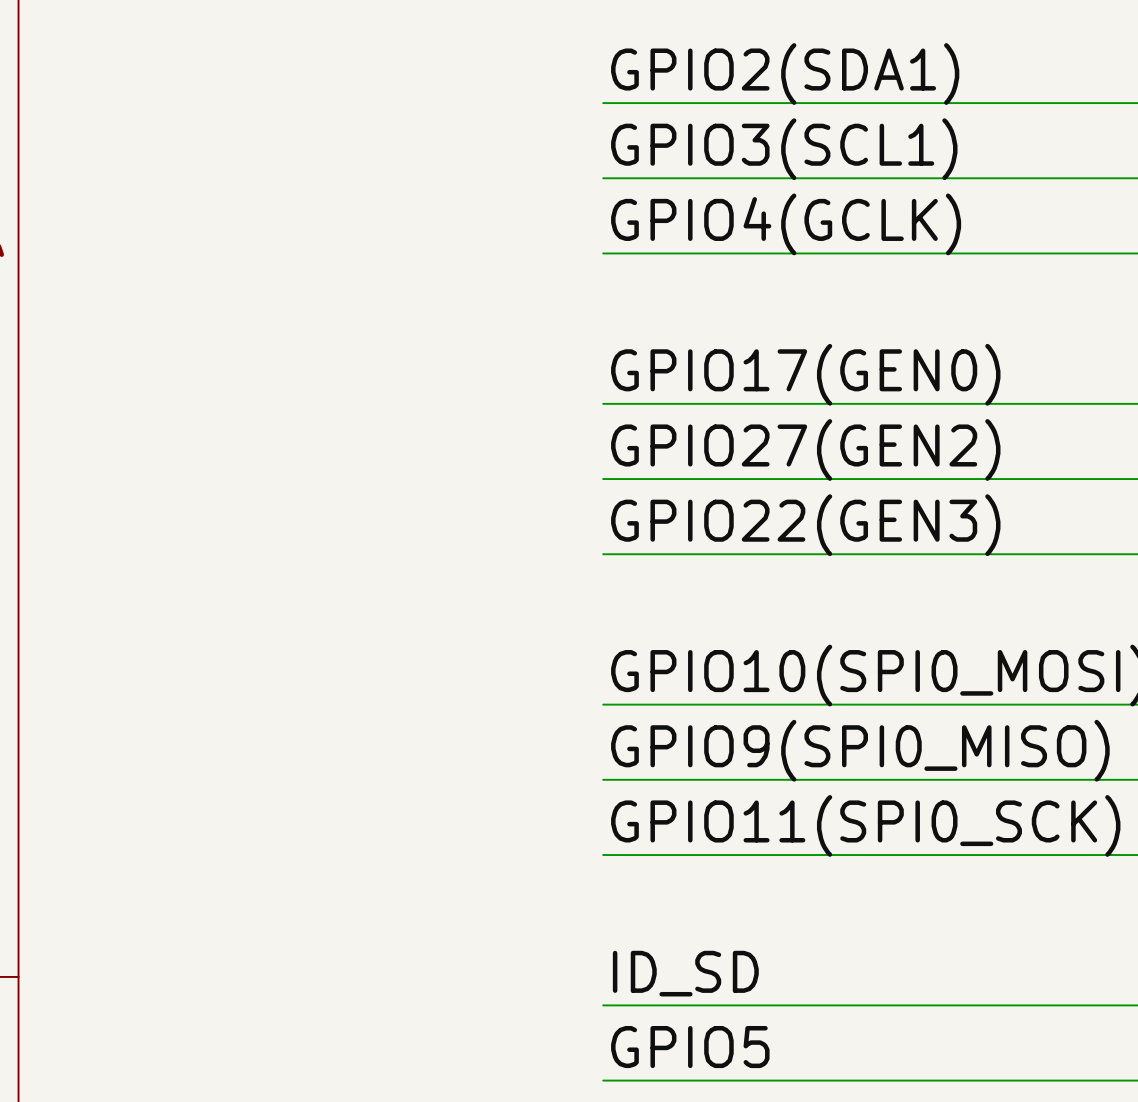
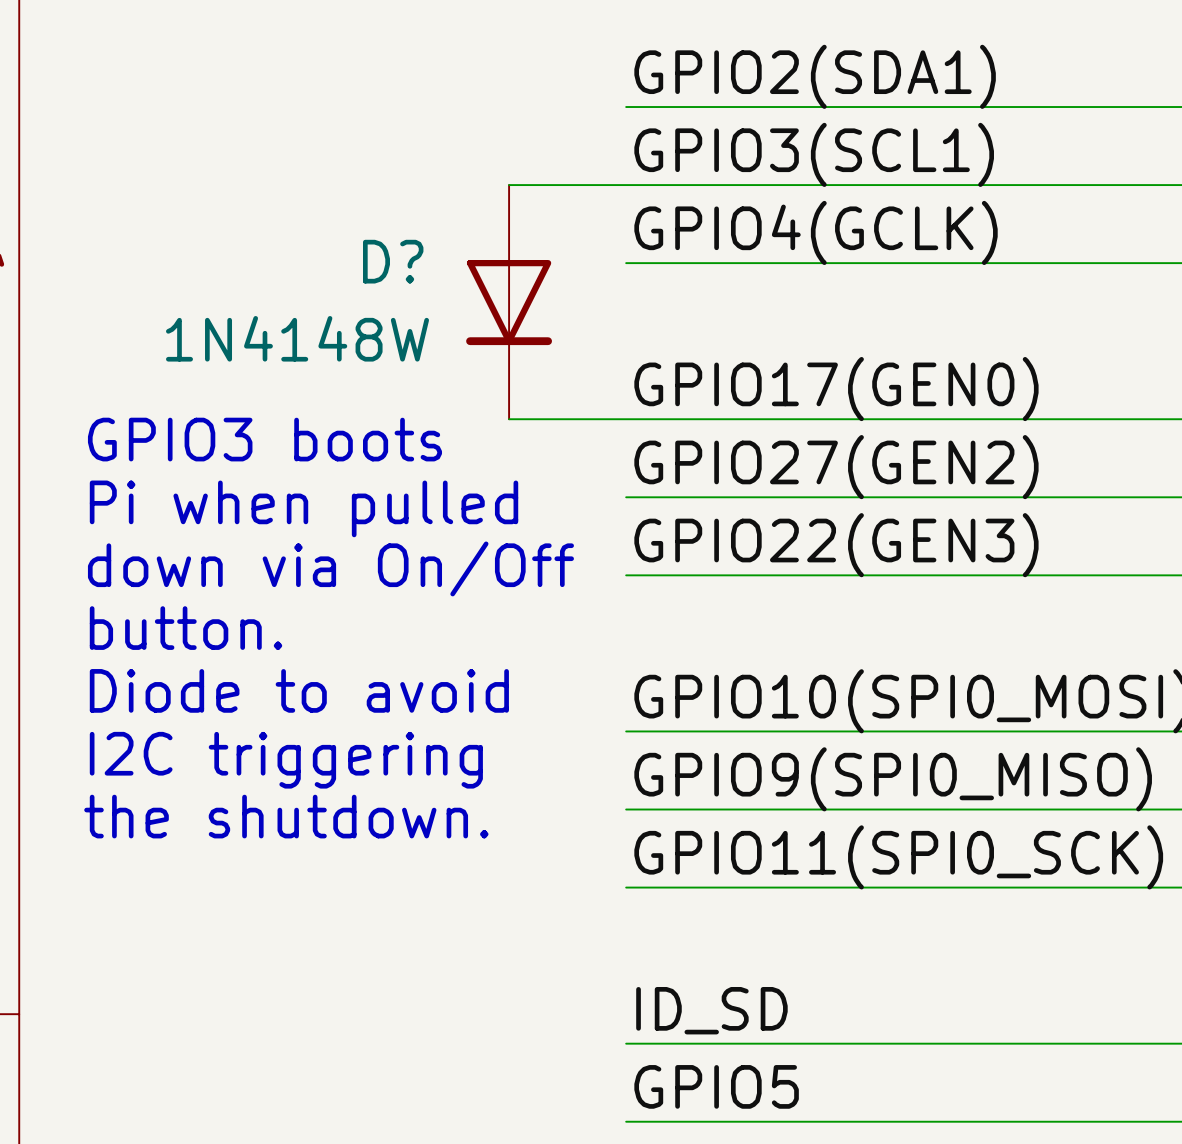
wire: none -> (509, 185) (626, 185)
D?: none -> 1N4148W (509, 302)
wire: none -> (509, 419) (626, 419)
text: none -> GPIO3 boots (264, 439)
text: none -> Pi when pulled (304, 508)
text: none -> down via On/Off (330, 568)
text: none -> button. (185, 628)
text: none -> Diode to avoid (299, 690)
text: none -> I2C triggering (286, 760)
text: none -> the shutdown. (286, 816)

